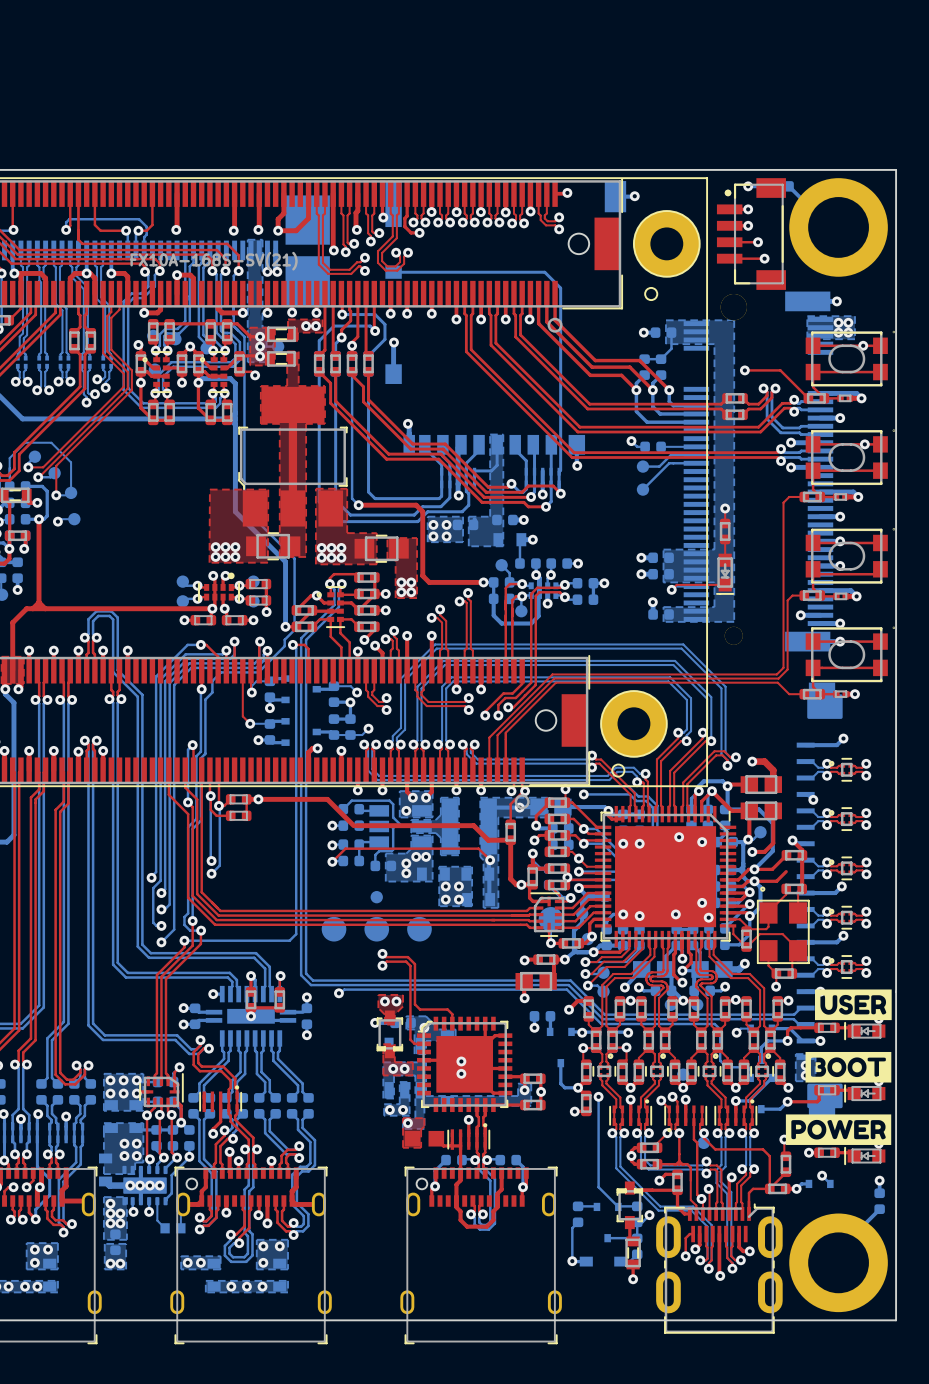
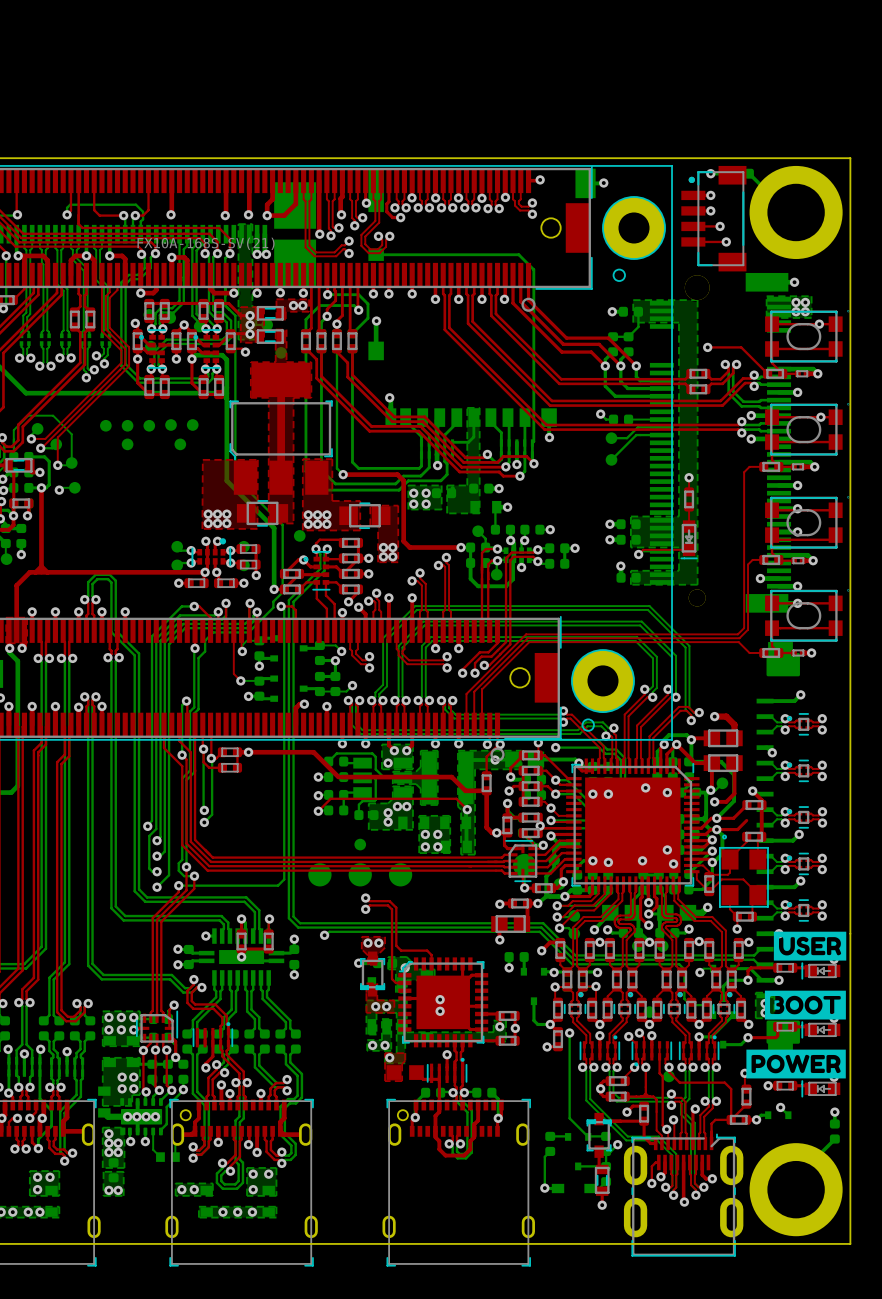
part: none -> (281, 352)
part: none -> (171, 424)
part: none -> (192, 424)
part: none -> (105, 425)
part: none -> (127, 425)
part: none -> (149, 425)
part: none -> (127, 444)
part: none -> (180, 444)
part: none -> (299, 535)

